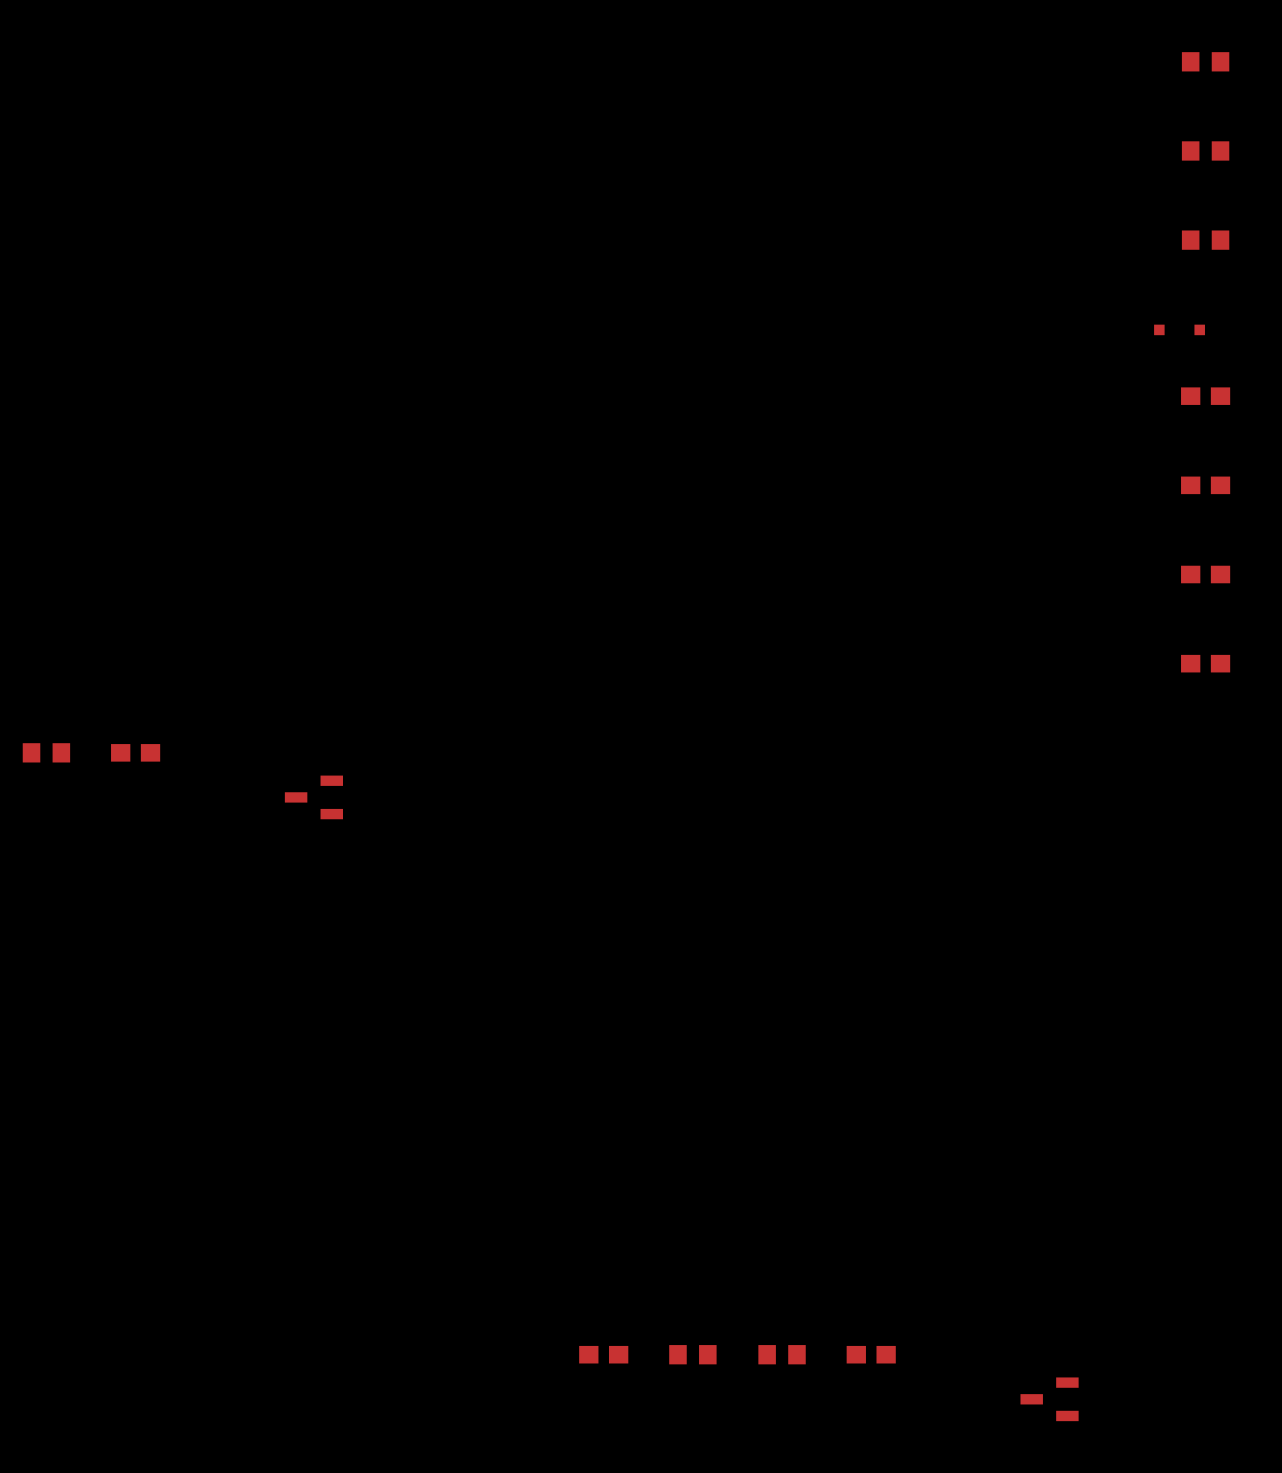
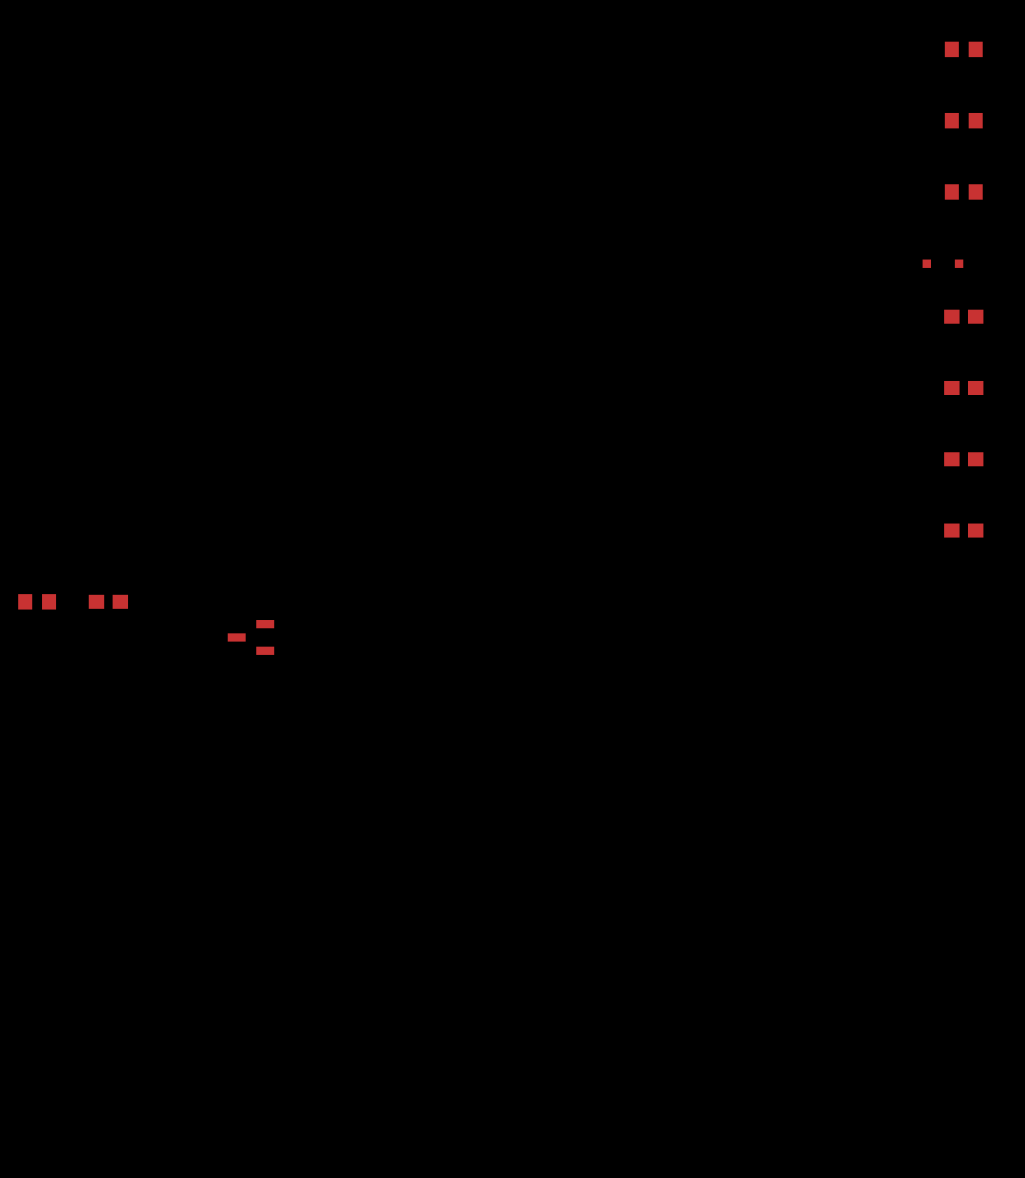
part: (603, 1354) -> none
part: (692, 1354) -> none
part: (782, 1354) -> none
part: (871, 1354) -> none
part: (1049, 1399) -> none

